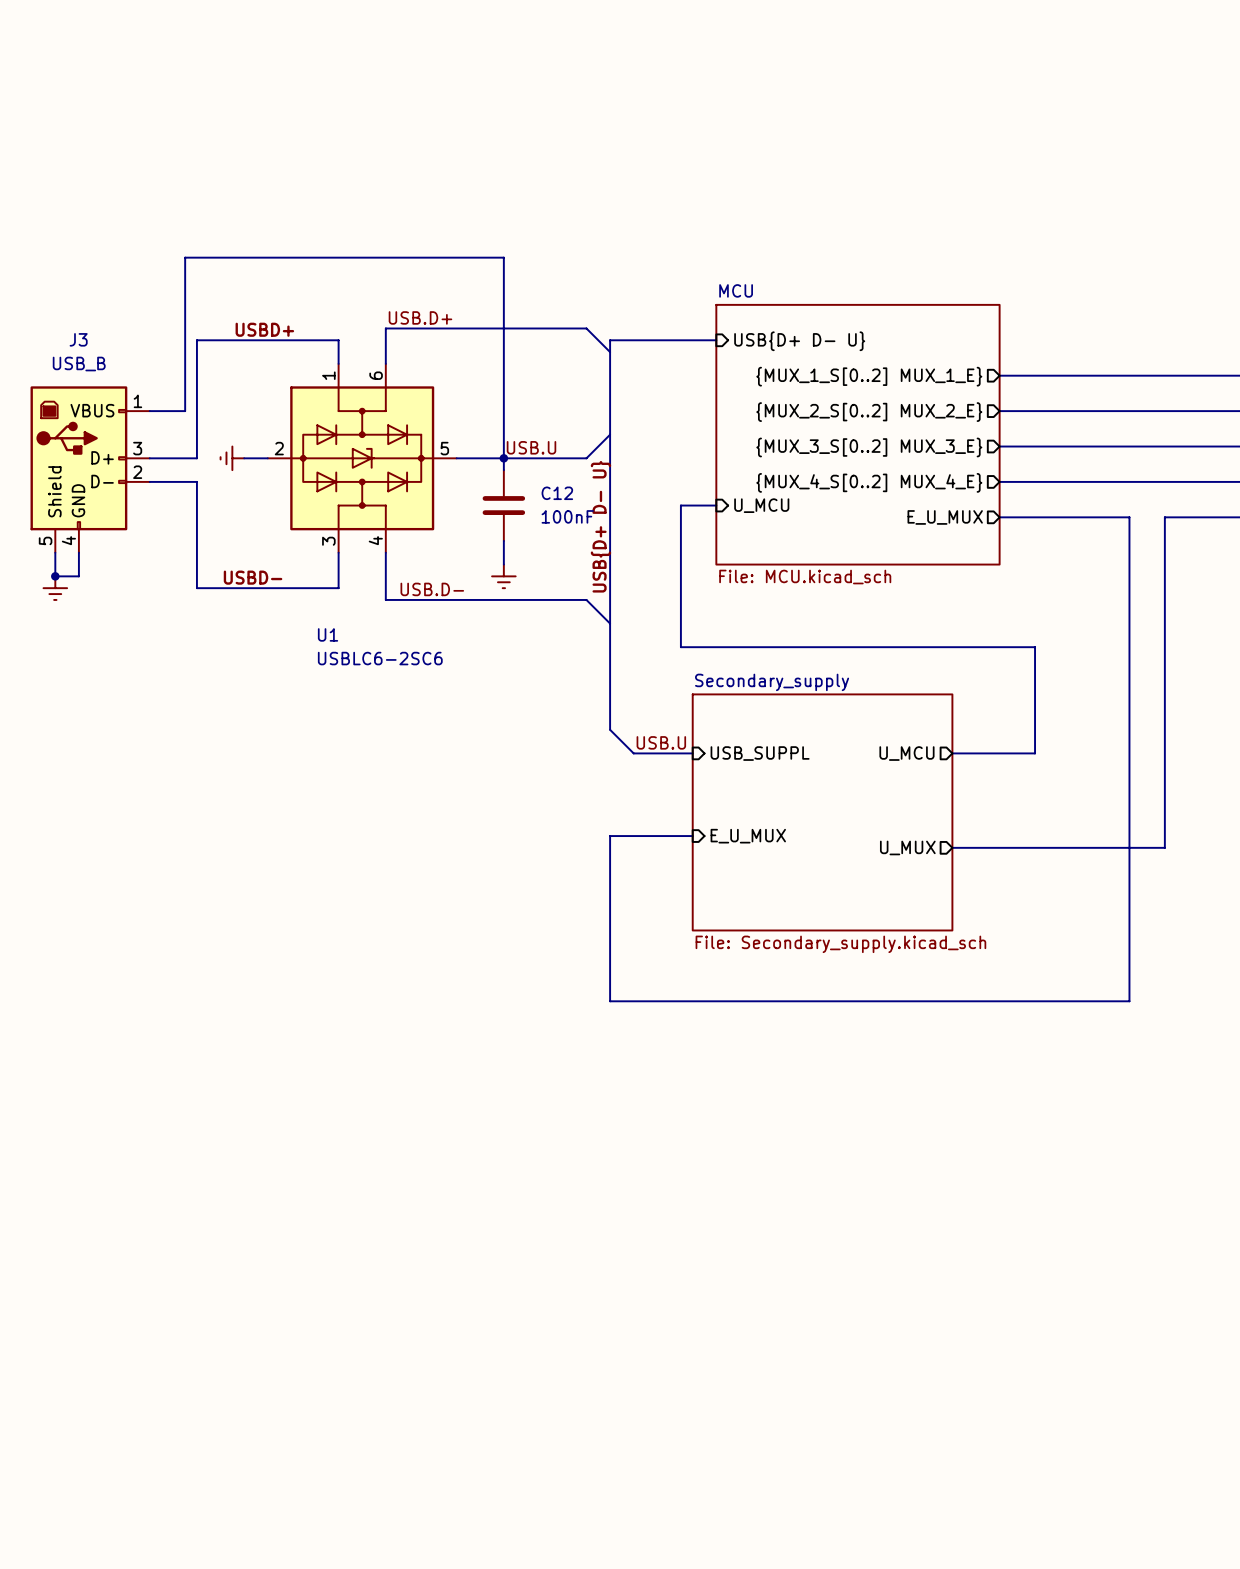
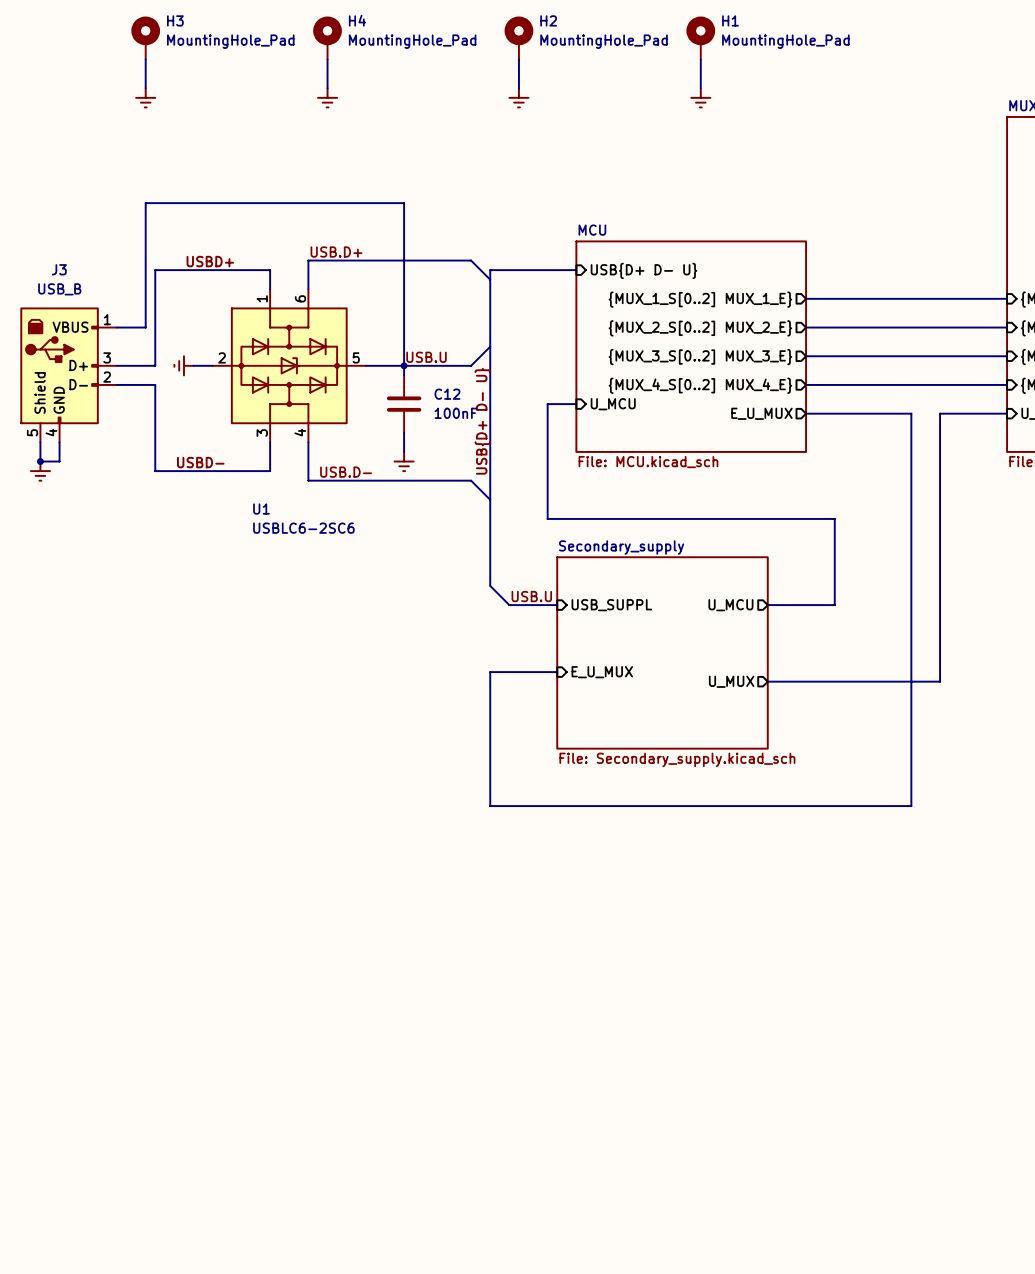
H3: none -> MountingHole_Pad (145, 38)
H4: none -> MountingHole_Pad (327, 38)
H2: none -> MountingHole_Pad (518, 38)
H1: none -> MountingHole_Pad (700, 38)
wire: none -> (145, 59) (145, 88)
wire: none -> (327, 59) (327, 88)
wire: none -> (518, 59) (518, 88)
wire: none -> (700, 59) (700, 88)
power symbol: none -> (145, 97)
power symbol: none -> (327, 97)
power symbol: none -> (518, 97)
power symbol: none -> (700, 97)

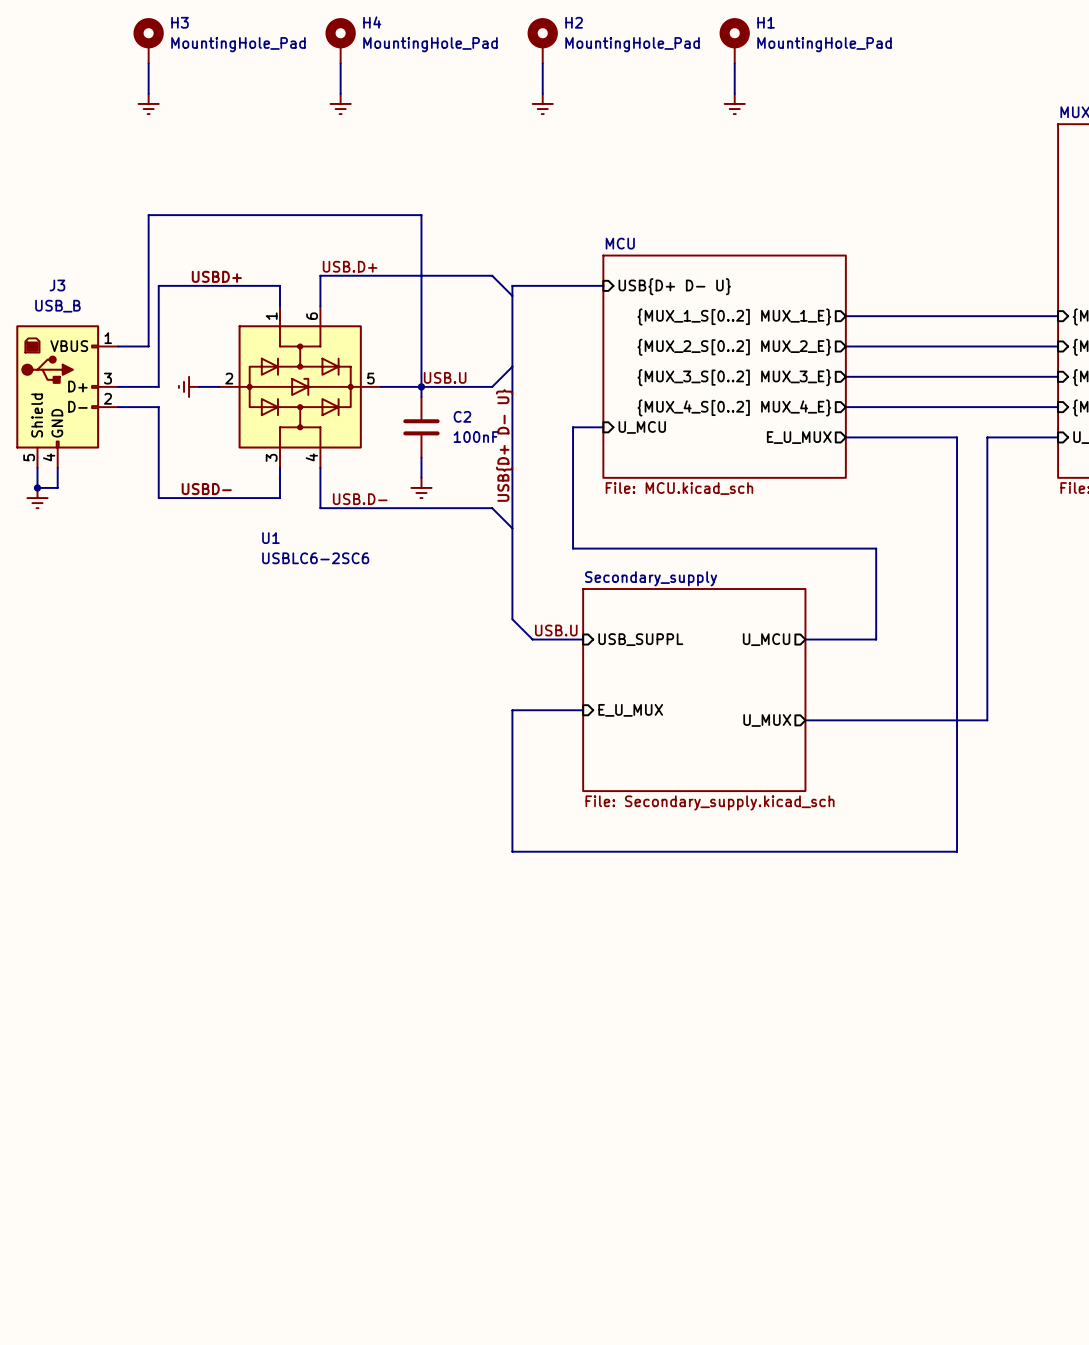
C12 name: C12 (447, 394) -> C2 (462, 416)

